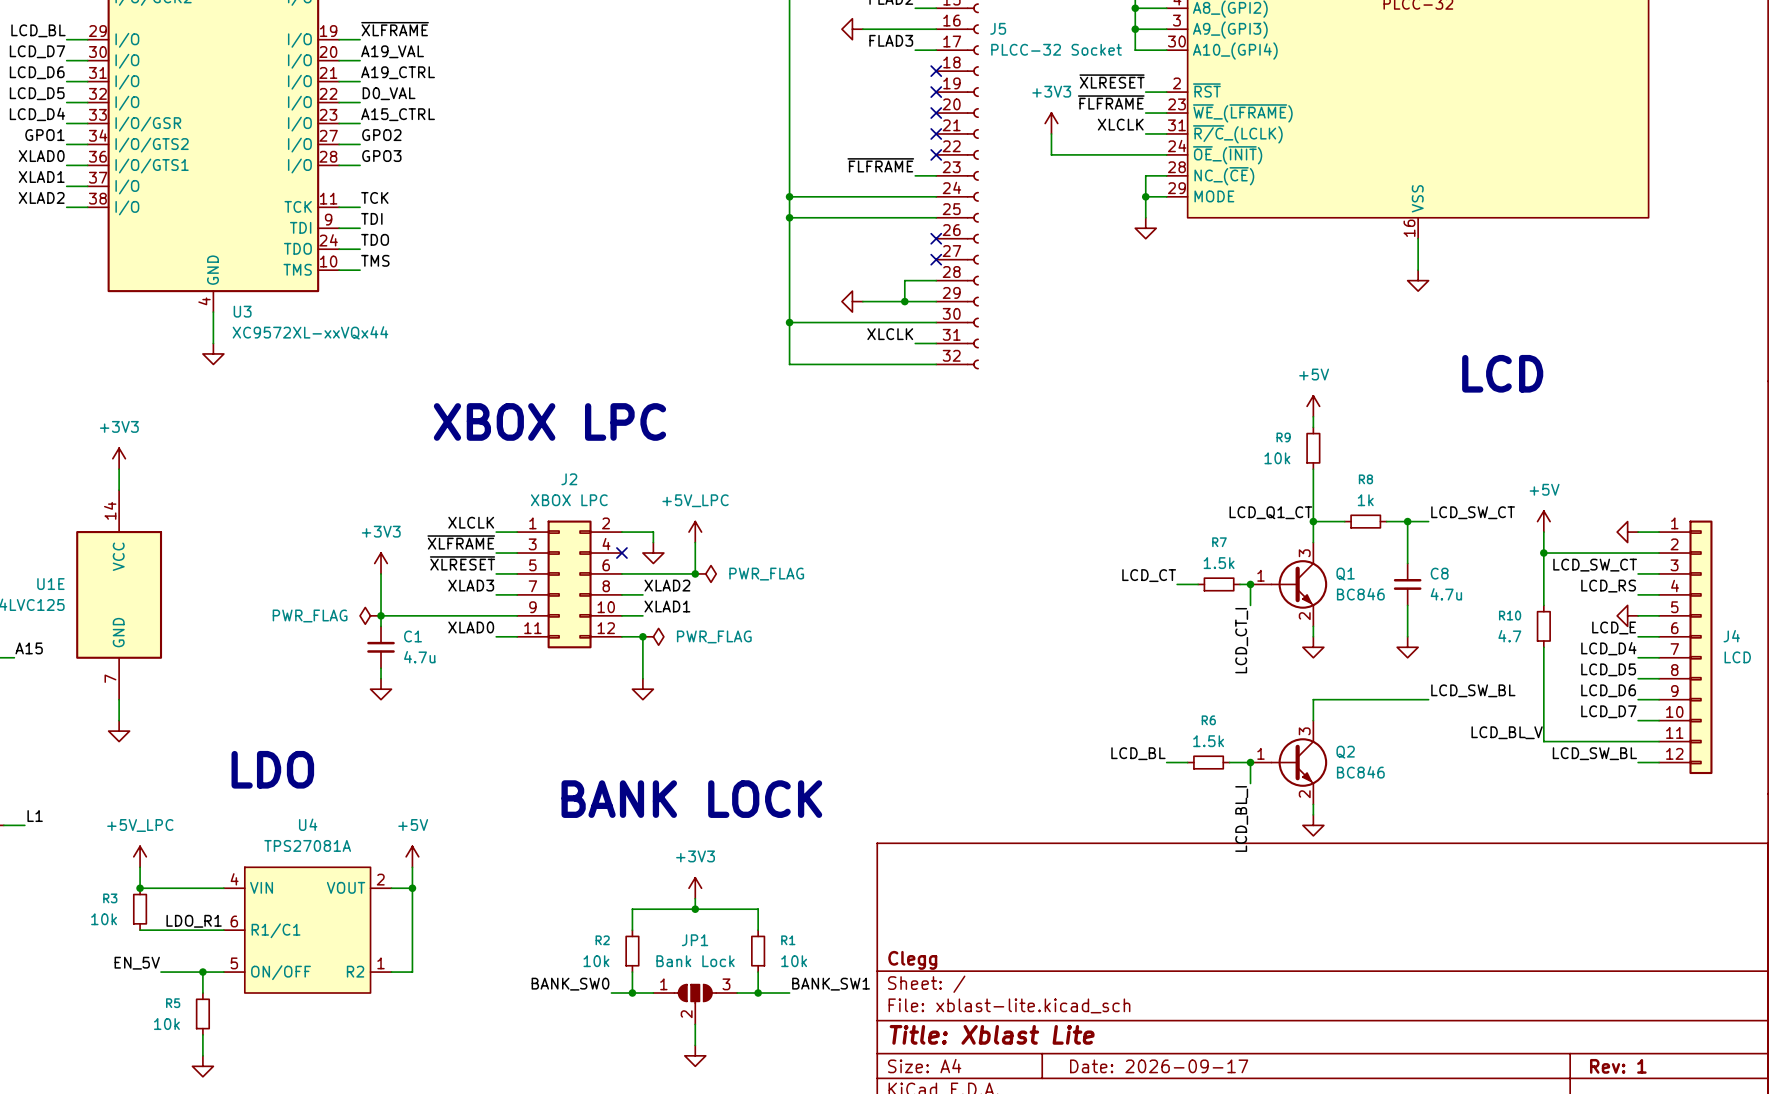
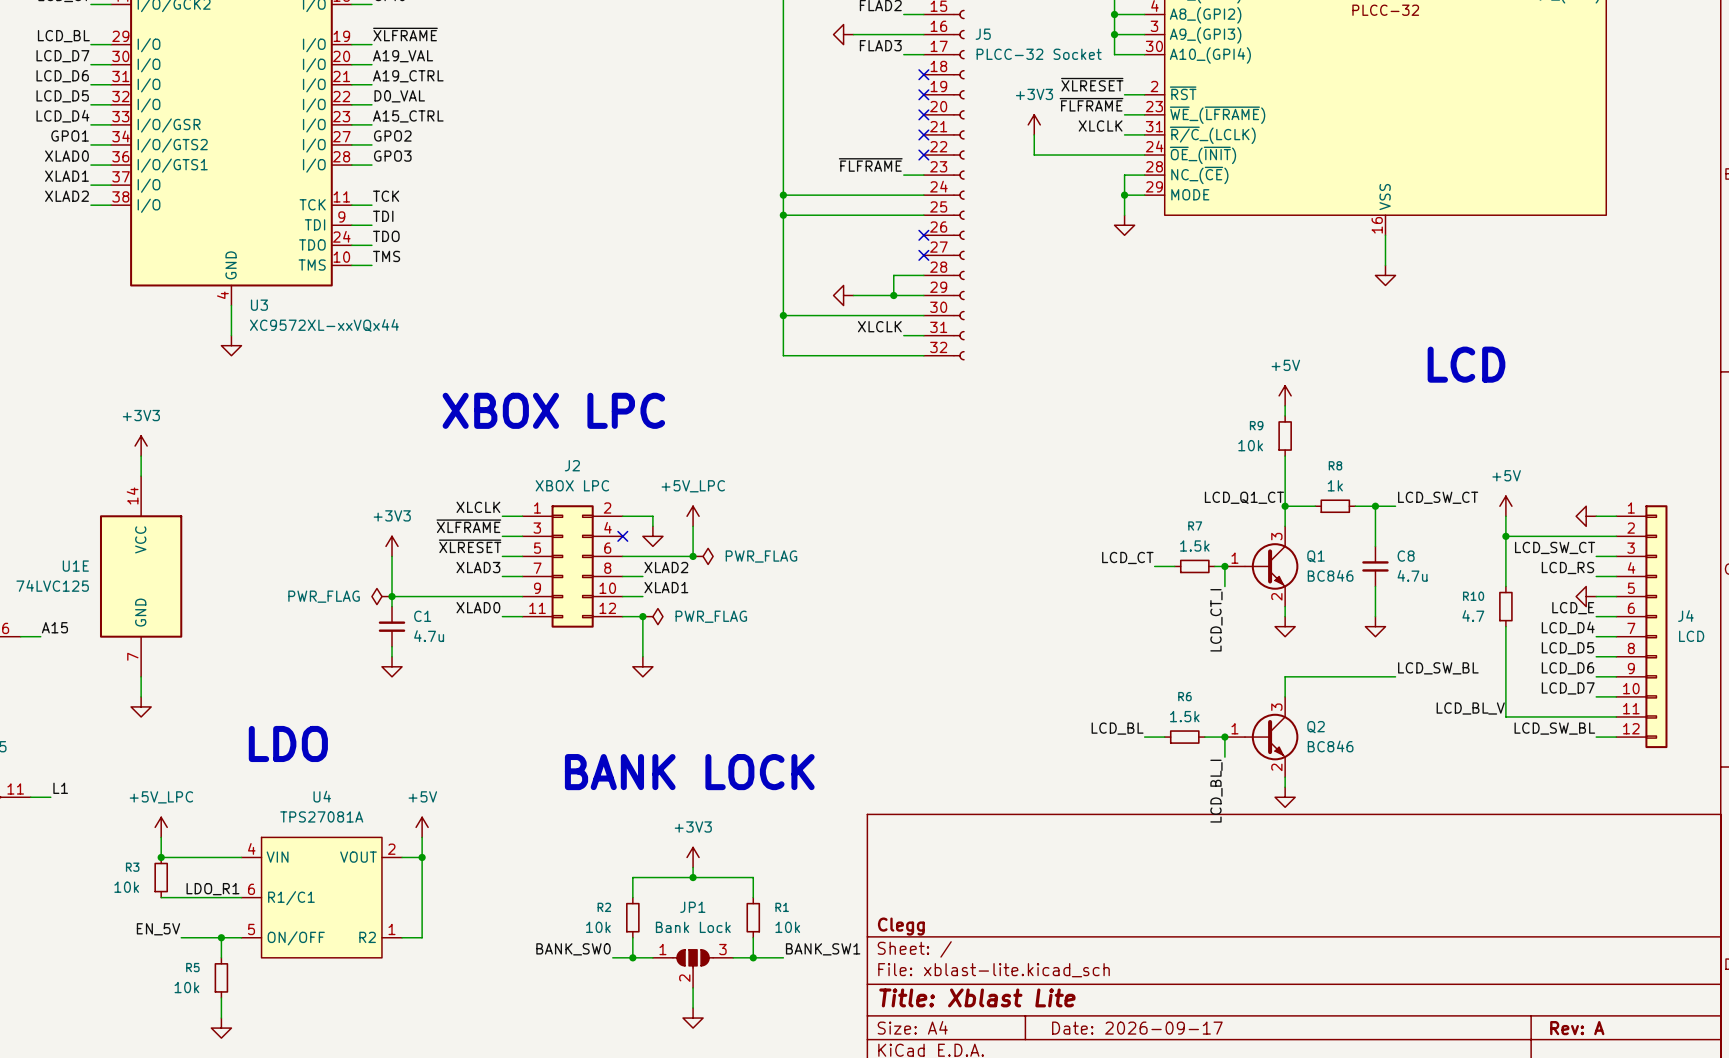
title block: Rev: 1 (1618, 1066) -> Rev: A (1577, 1028)

